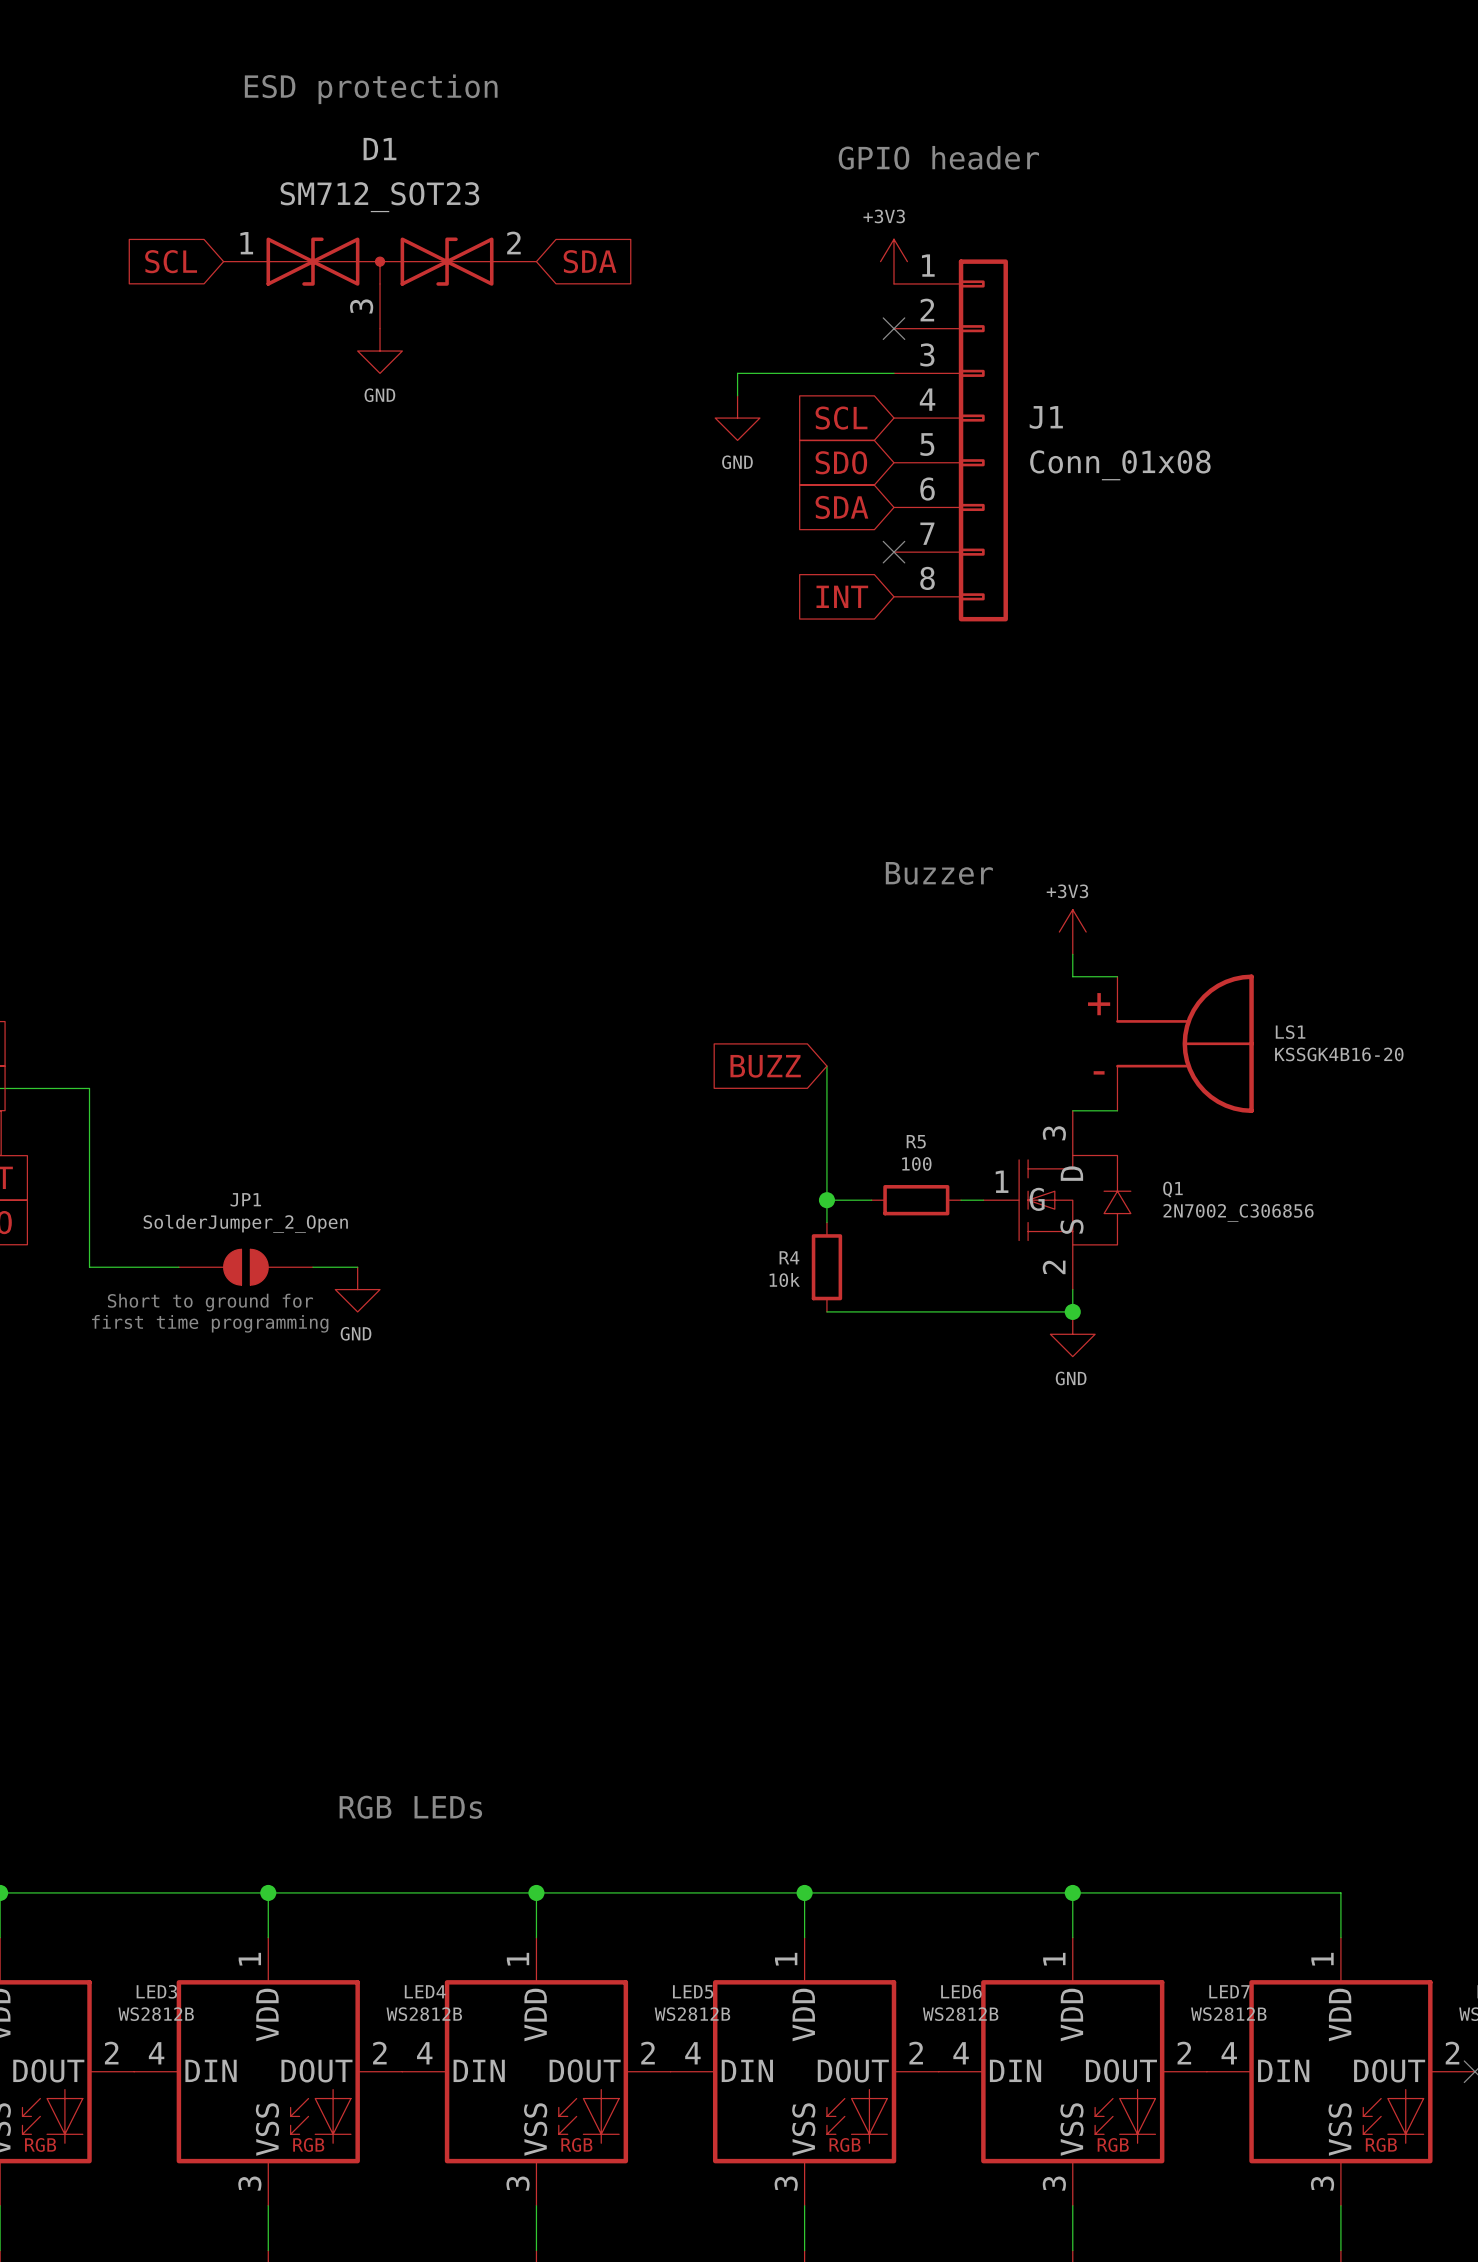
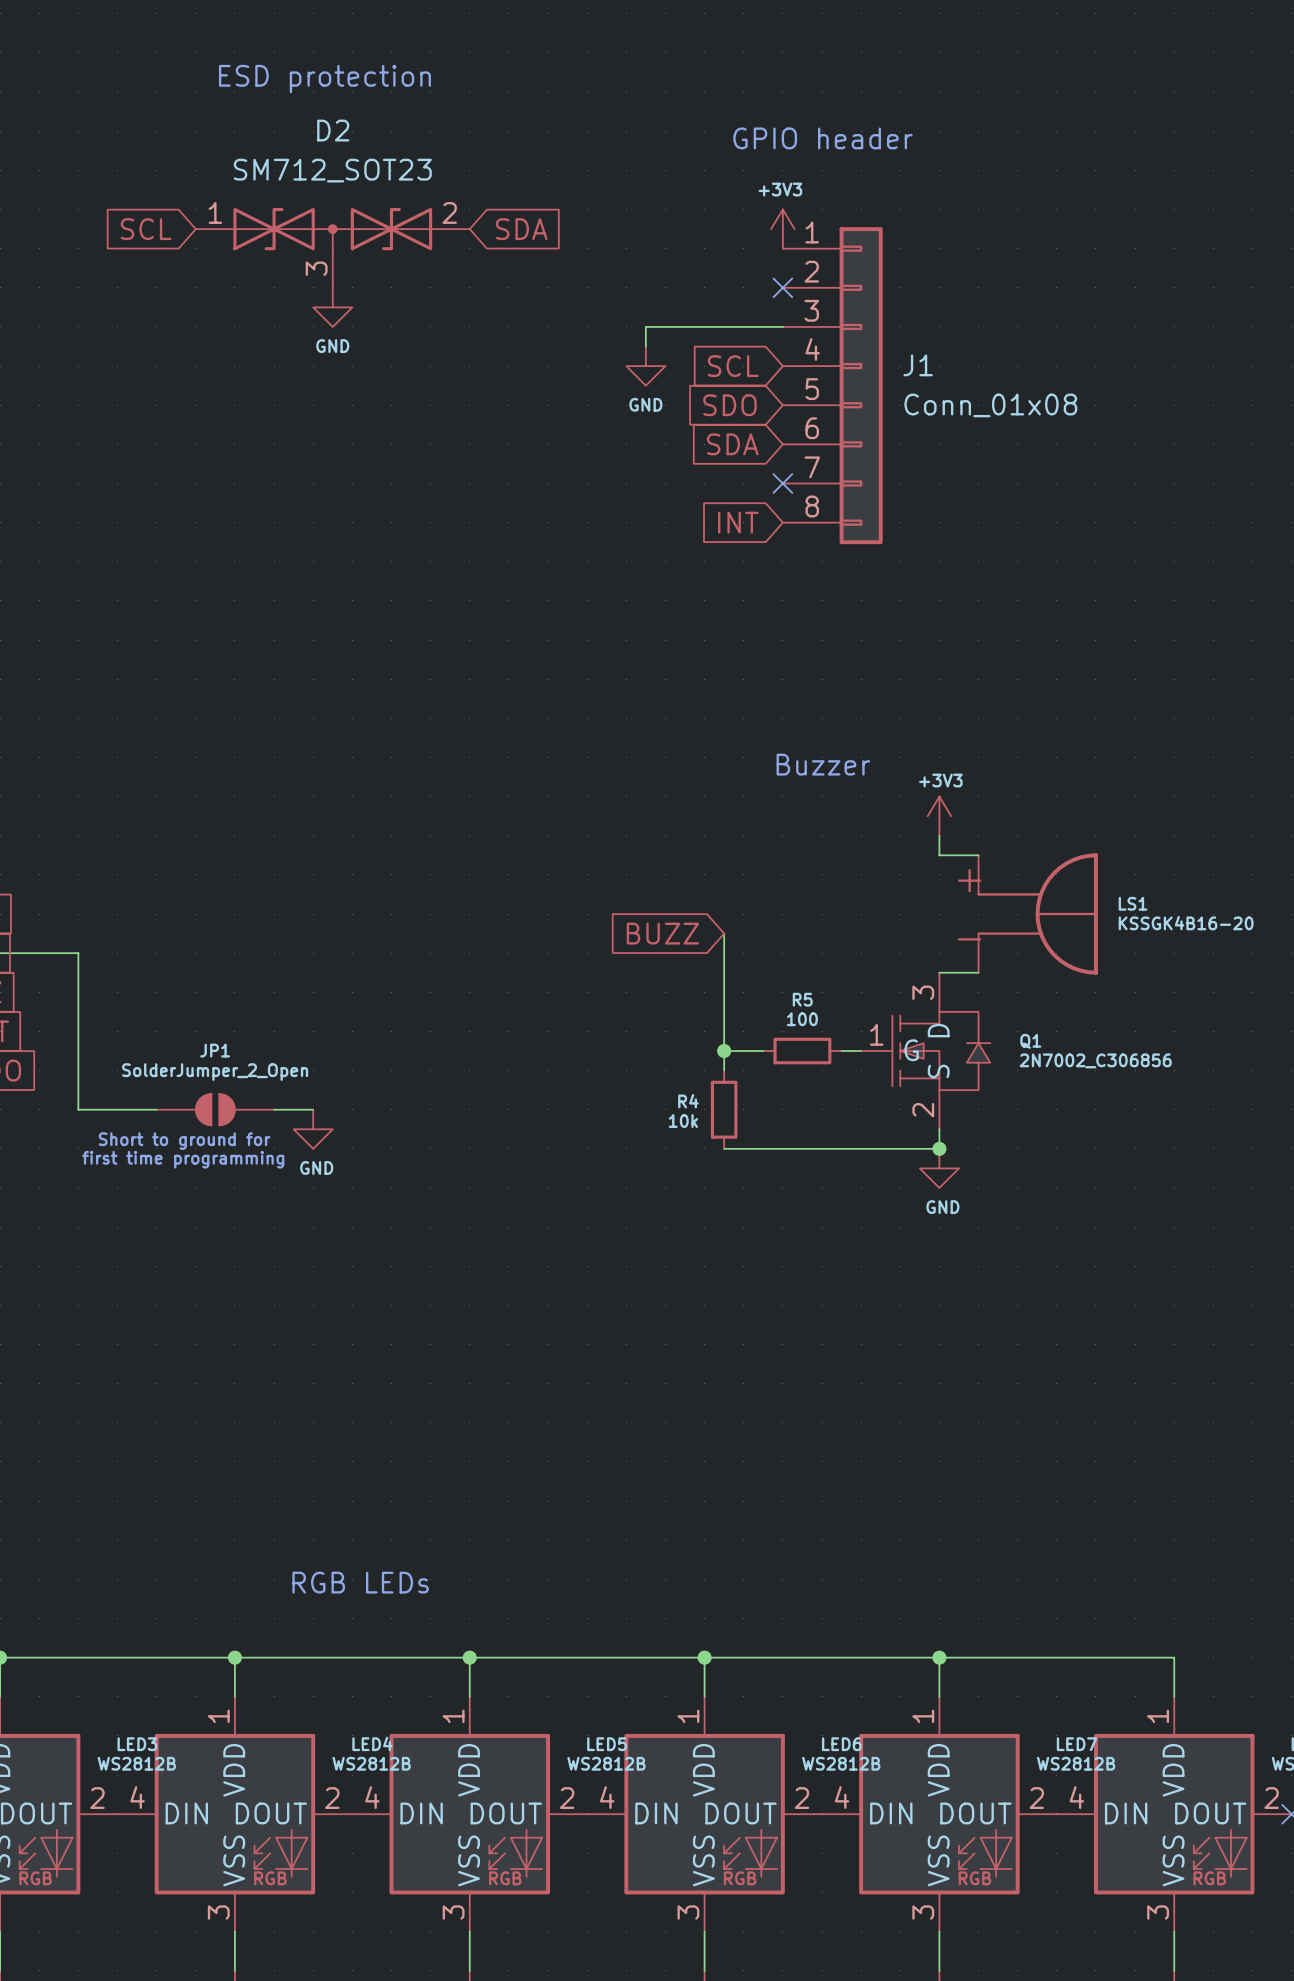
D1 name: D1 (380, 149) -> D2 (333, 130)

